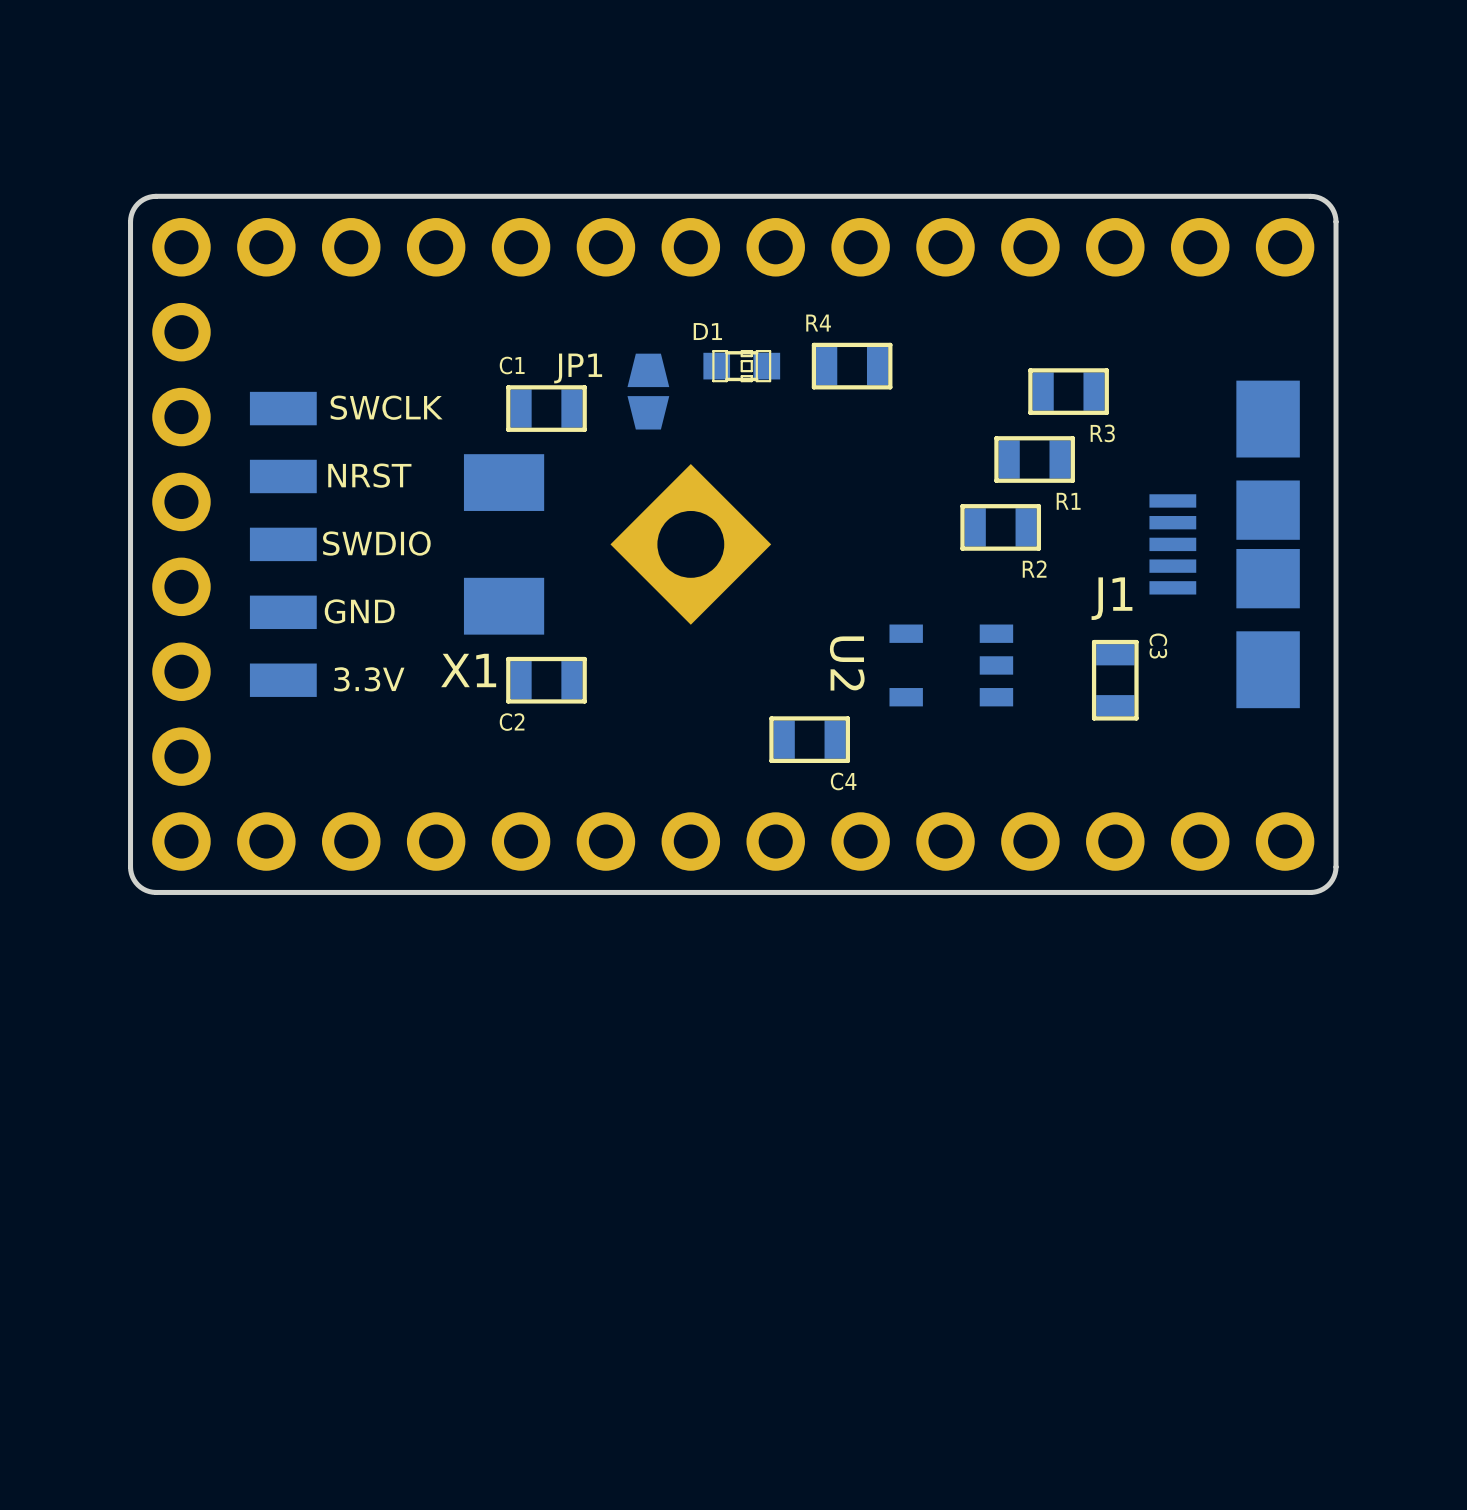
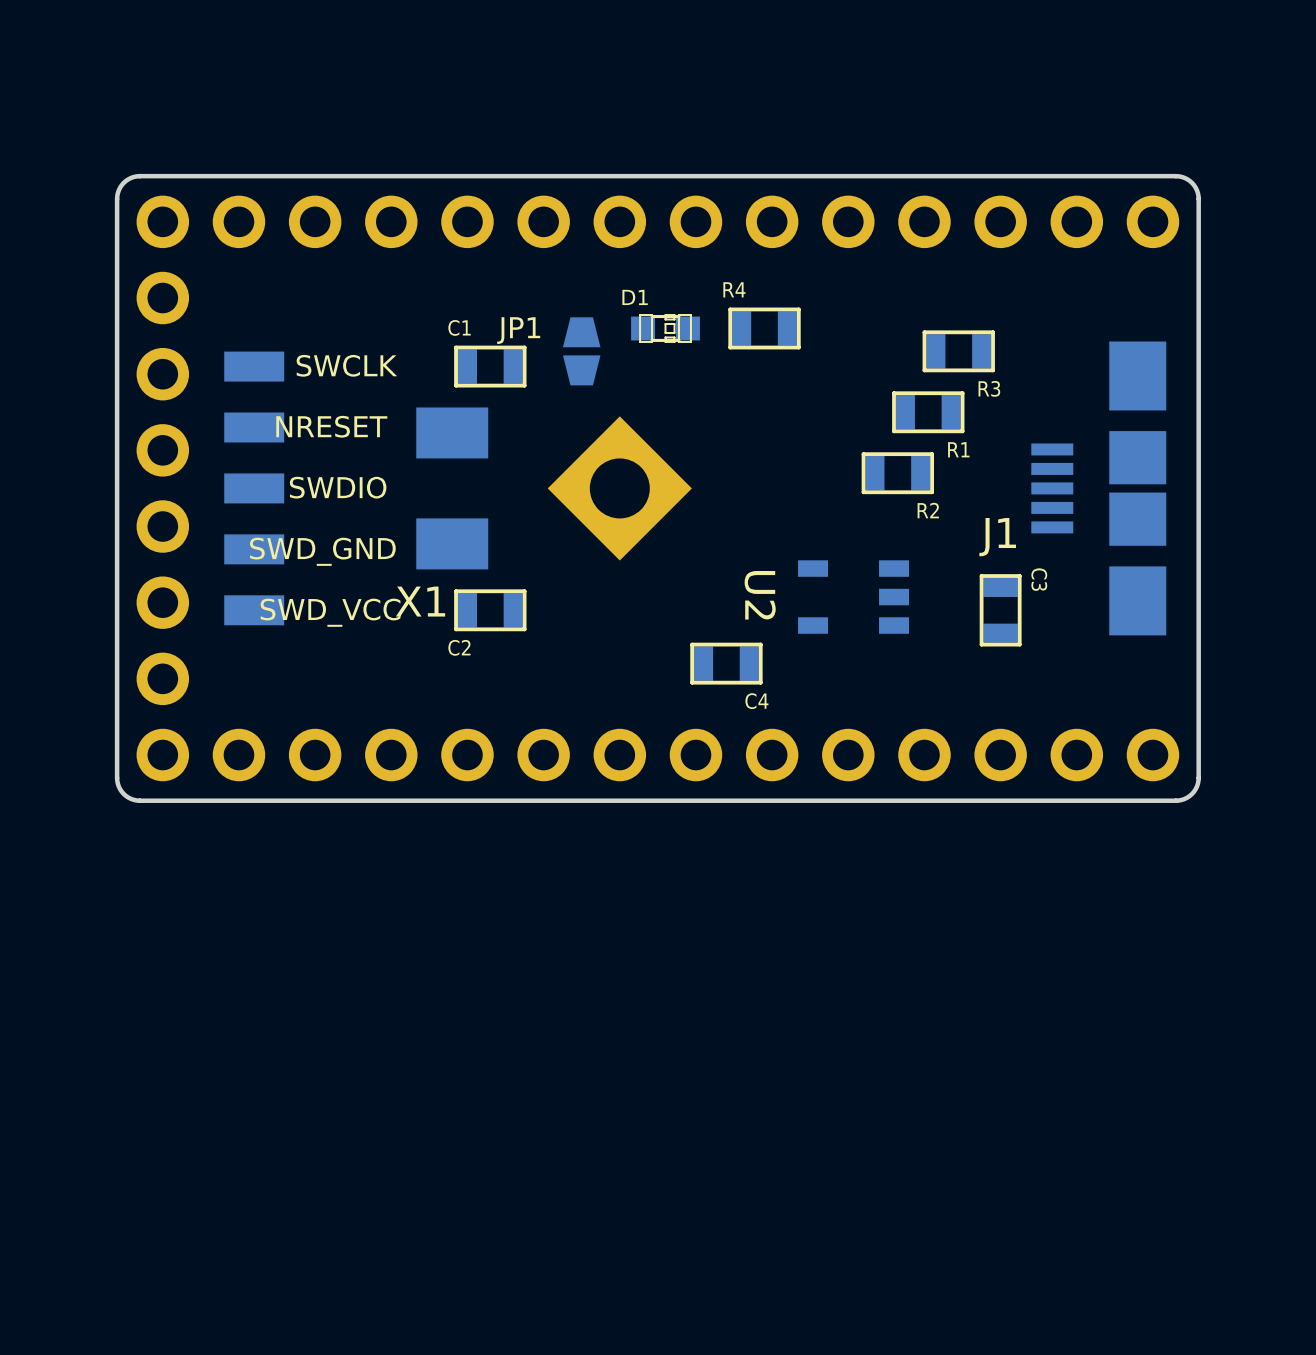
part value: NRST (369, 475) -> NRESET (331, 426)
part value: GND (359, 611) -> SWD_GND (322, 551)
part value: 3.3V (369, 679) -> SWD_VCC (330, 612)

